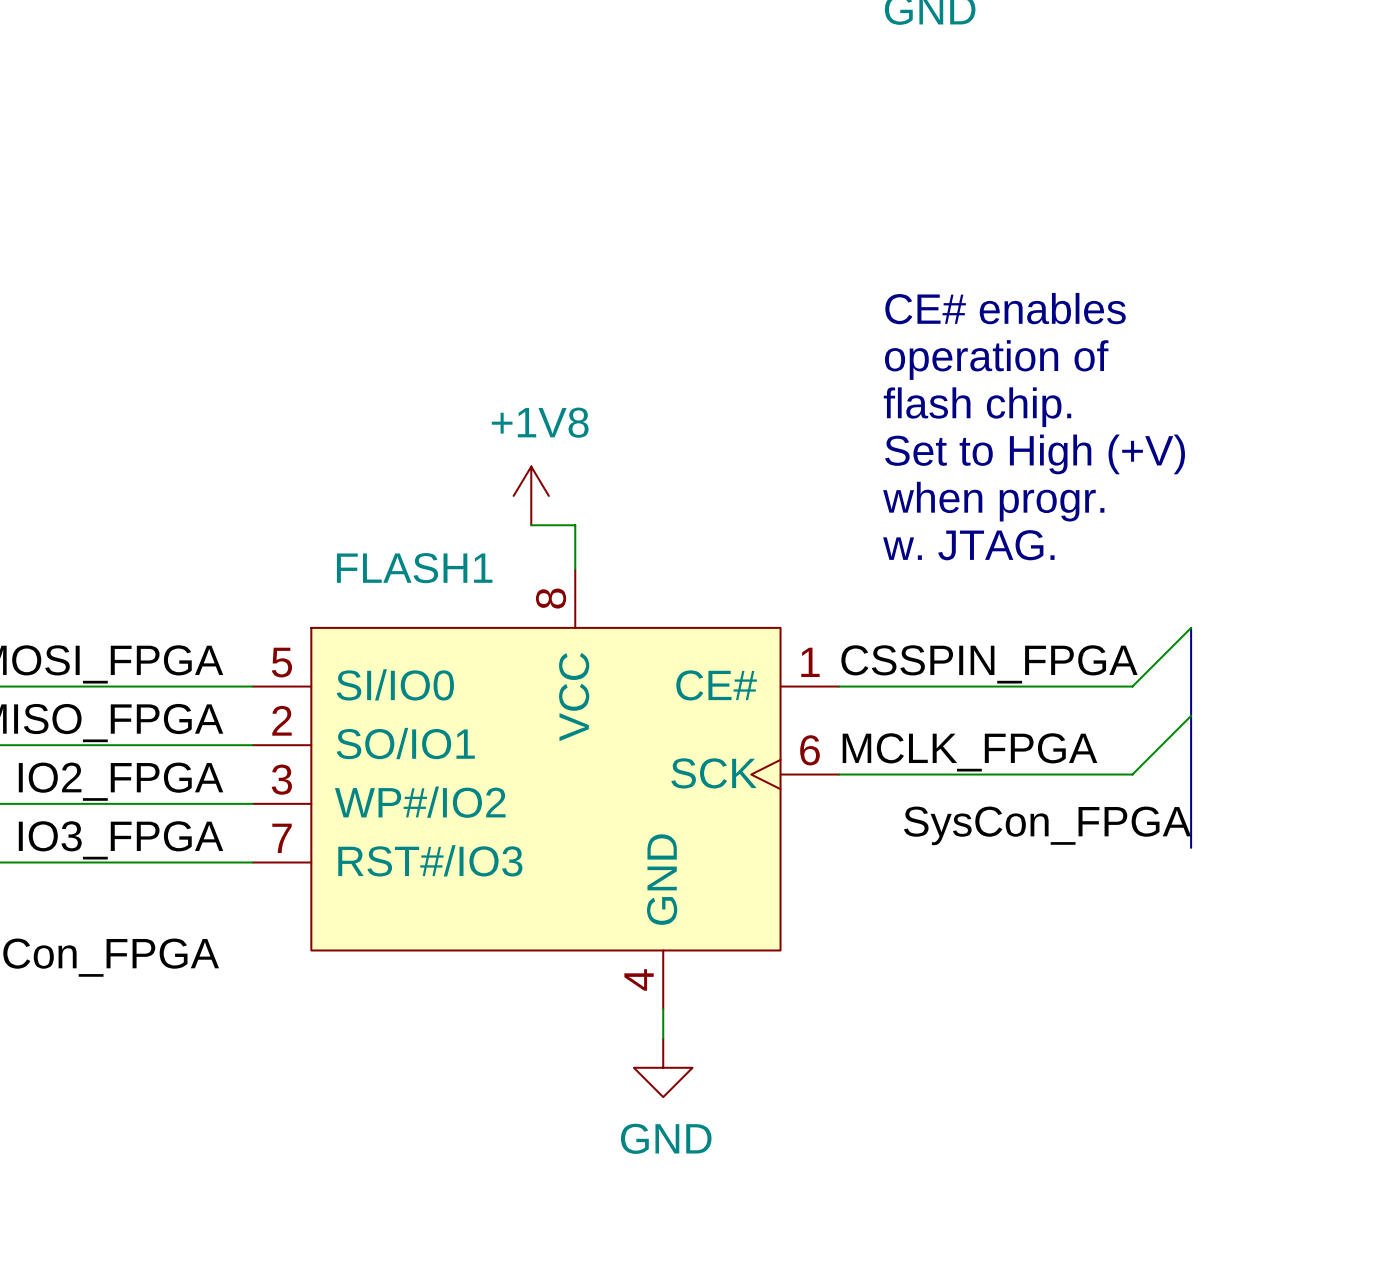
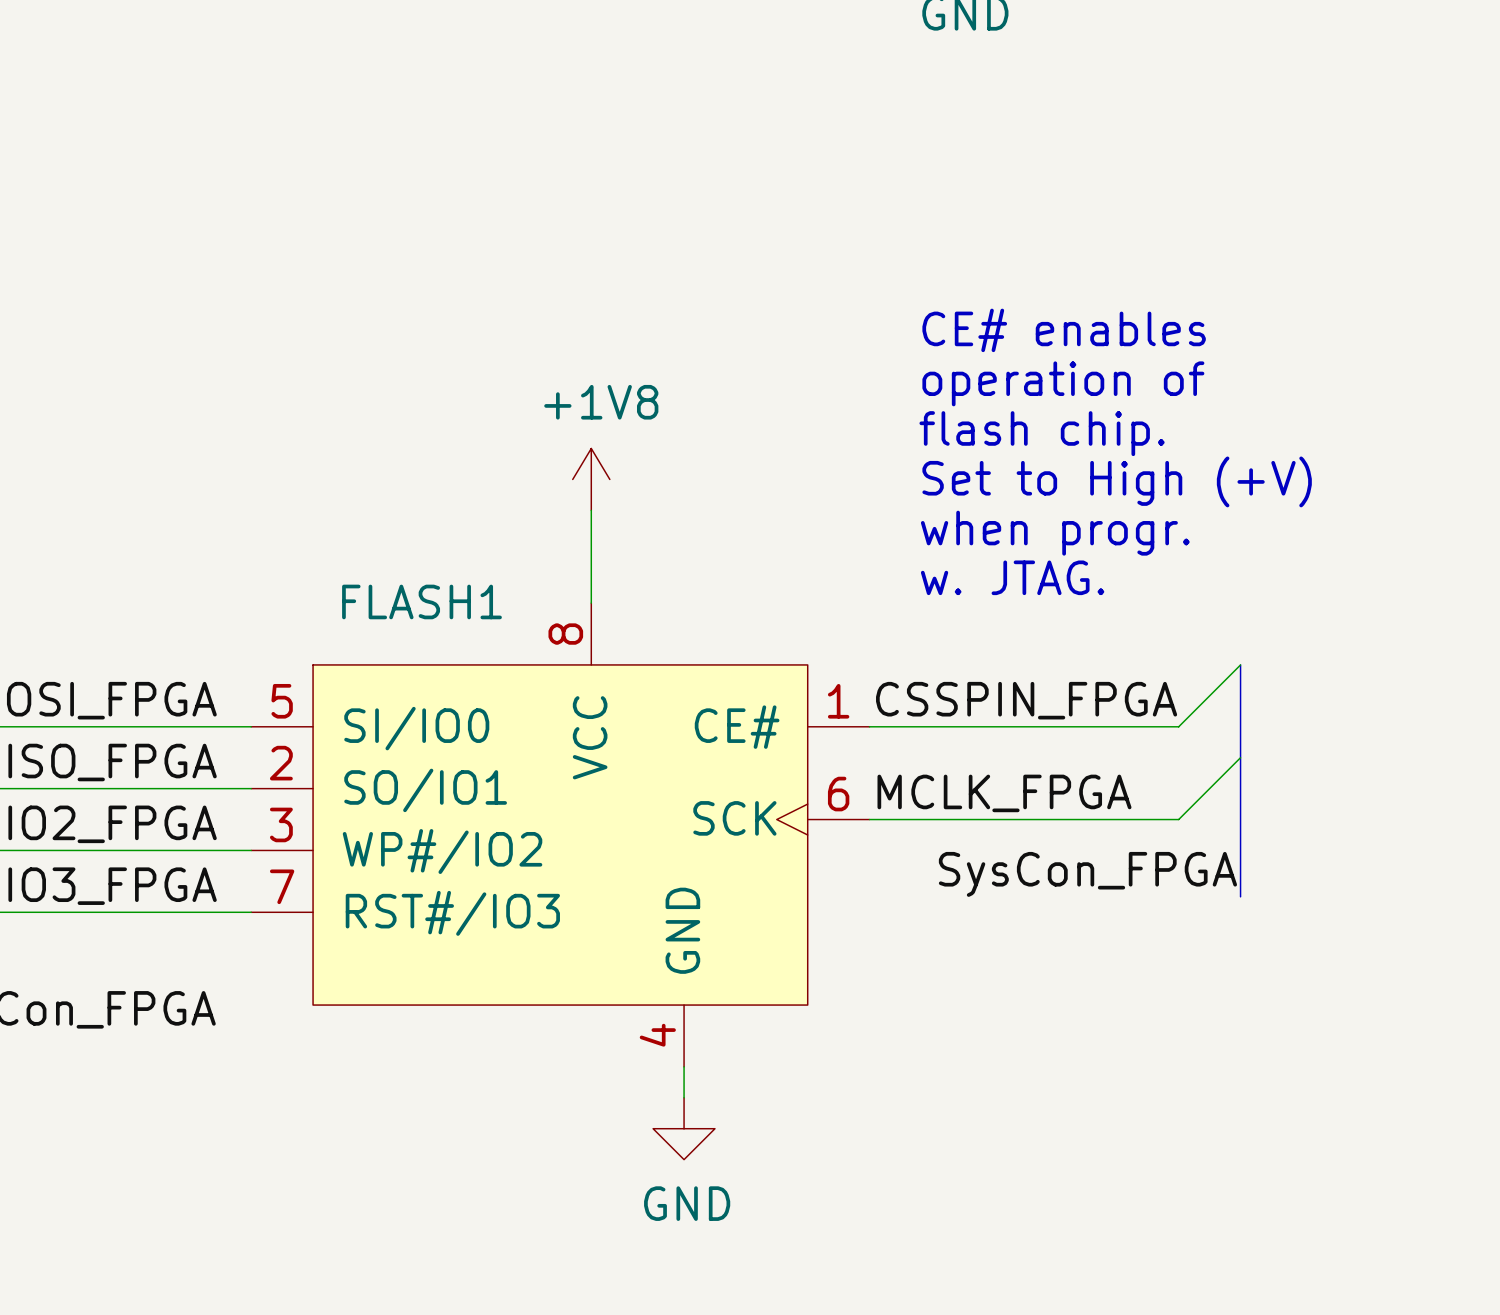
power symbol position: +1V8 (531, 495) -> +1V8 (591, 479)
wire: (531, 525) (575, 525) -> (591, 510) (591, 556)

